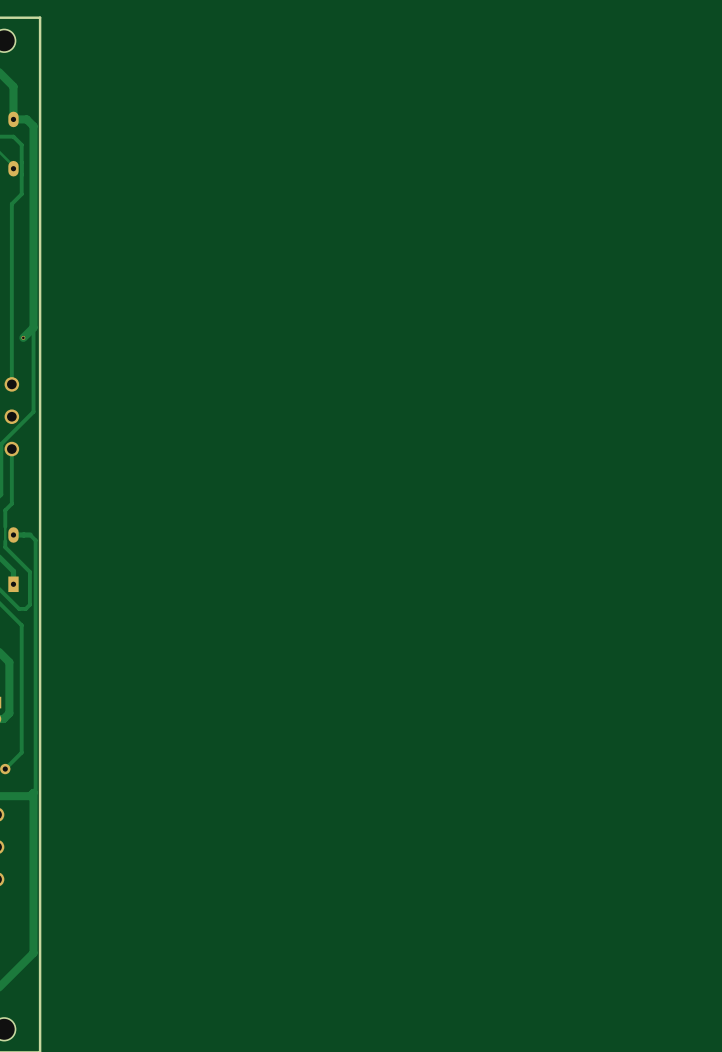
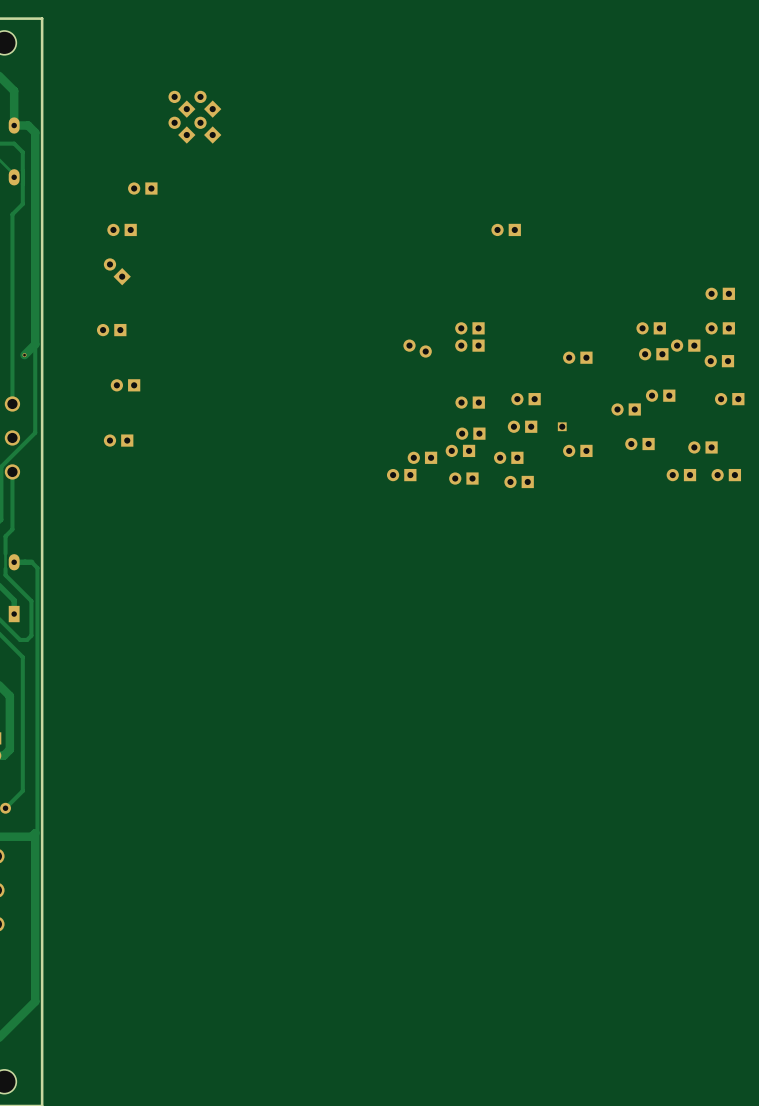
part: none -> (181, 104)
part: none -> (207, 104)
part: none -> (181, 130)
part: none -> (207, 130)
part: none -> (142, 188)
part: none -> (122, 229)
part: none -> (506, 229)
part: none -> (117, 271)
part: none -> (720, 293)
part: none -> (469, 328)
part: none -> (651, 328)
part: none -> (720, 328)
part: none -> (111, 330)
part: none -> (469, 345)
part: none -> (685, 345)
part: none -> (417, 348)
part: none -> (653, 354)
part: none -> (577, 357)
part: none -> (719, 361)
part: none -> (125, 385)
part: none -> (660, 395)
part: none -> (526, 399)
part: none -> (729, 399)
part: none -> (470, 402)
part: none -> (626, 409)
part: none -> (522, 426)
part: none -> (562, 426)
part: none -> (470, 433)
part: none -> (118, 440)
part: none -> (639, 444)
part: none -> (702, 447)
part: none -> (460, 450)
part: none -> (577, 450)
part: none -> (422, 457)
part: none -> (508, 457)
part: none -> (401, 475)
part: none -> (681, 475)
part: none -> (726, 475)
part: none -> (463, 478)
part: none -> (519, 481)

